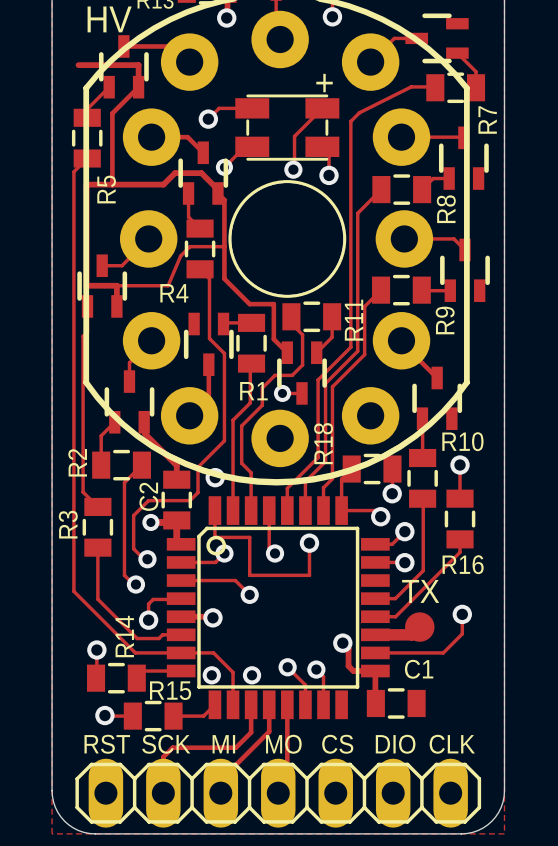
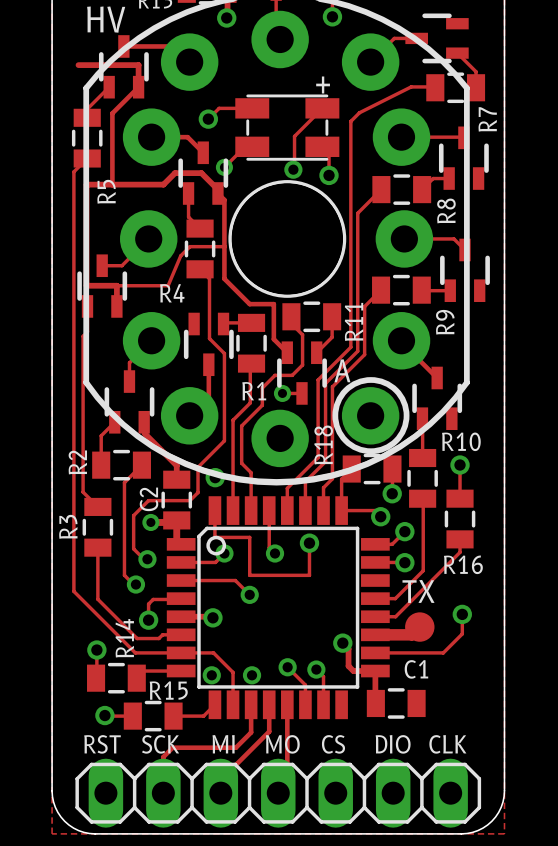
text: none -> A (342, 370)
drawing: none -> [332, 377, 410, 455]

